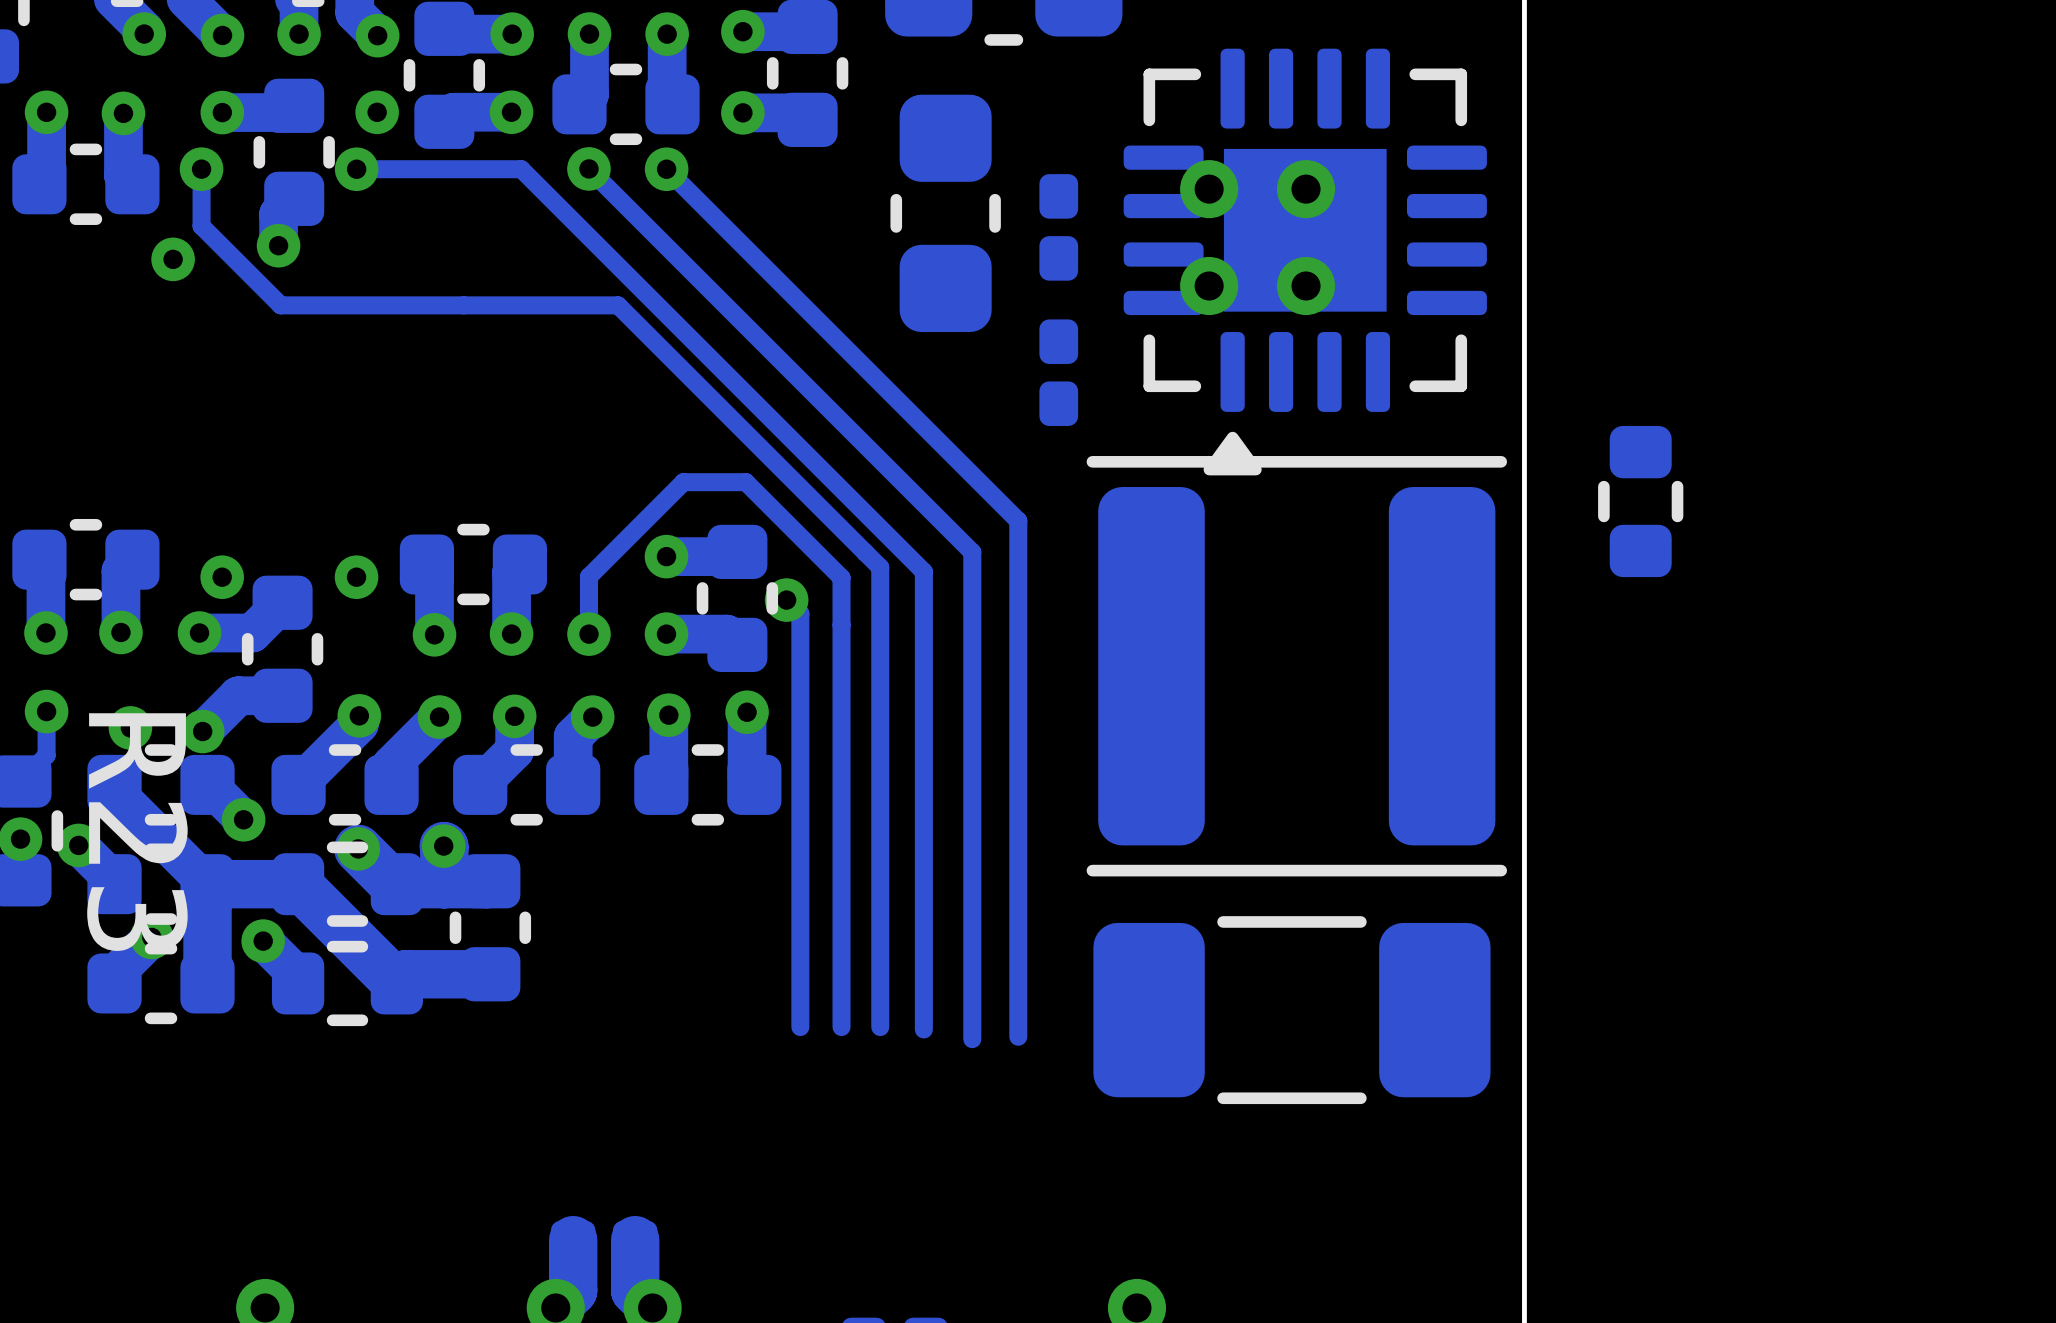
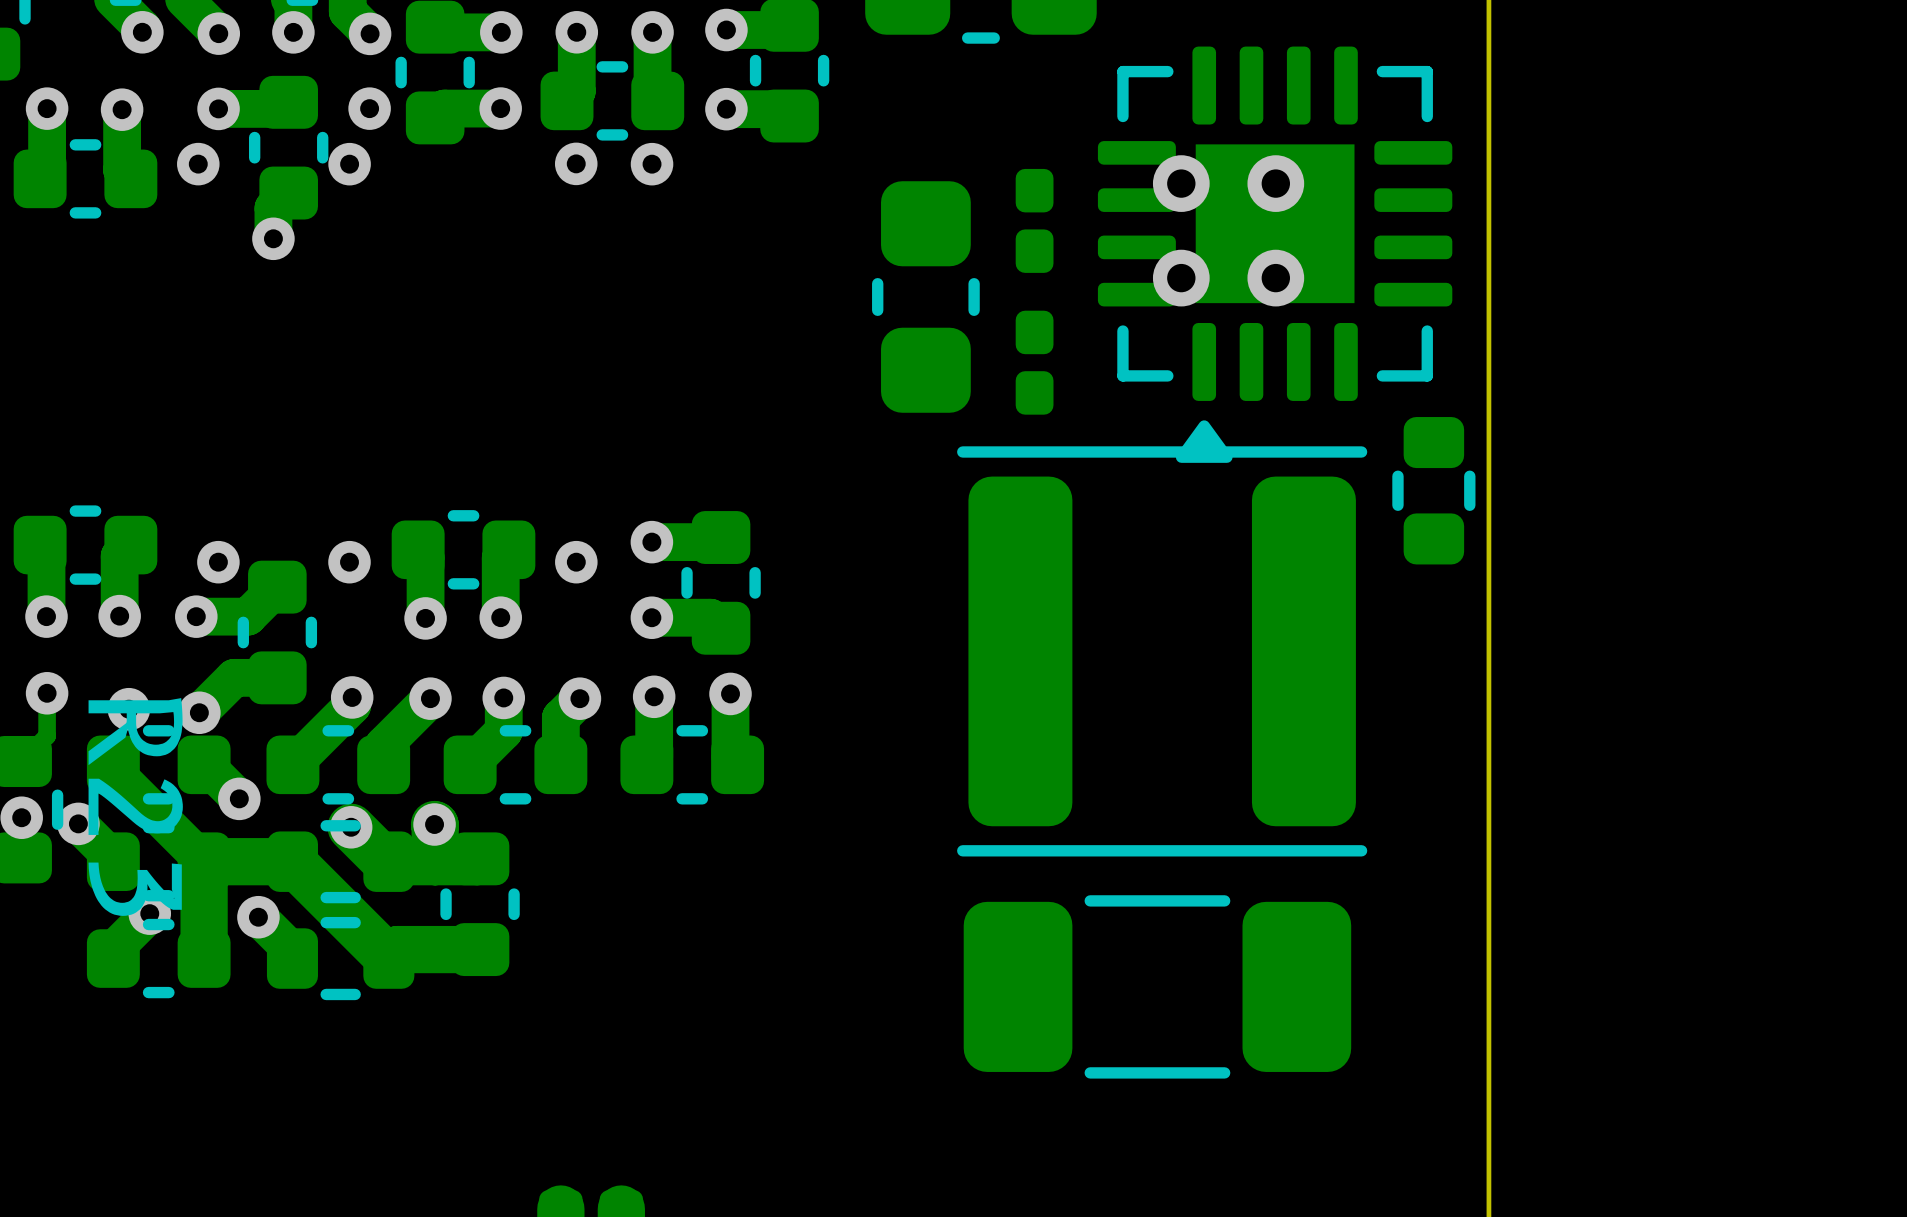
track: (588, 168) (972, 552) (972, 1039) -> none
track: (201, 169) (201, 226) (280, 305) (618, 305) (880, 567) (880, 1027) -> none
track: (356, 169) (521, 169) (923, 571) (923, 1029) -> none
track: (666, 169) (1018, 520) (1018, 1036) -> none
part position: (945, 213) -> (925, 296)
via: (173, 259) -> none
part position: (1640, 501) -> (1433, 490)
track: (786, 600) (800, 613) (800, 1027) -> none
via: (786, 600) -> none
track: (588, 634) (588, 576) (683, 482) (745, 482) (841, 577) (841, 1027) -> none
via position: (588, 634) -> (576, 562)
part position: (1296, 666) -> (1162, 651)
part position: (1291, 1010) -> (1157, 986)

